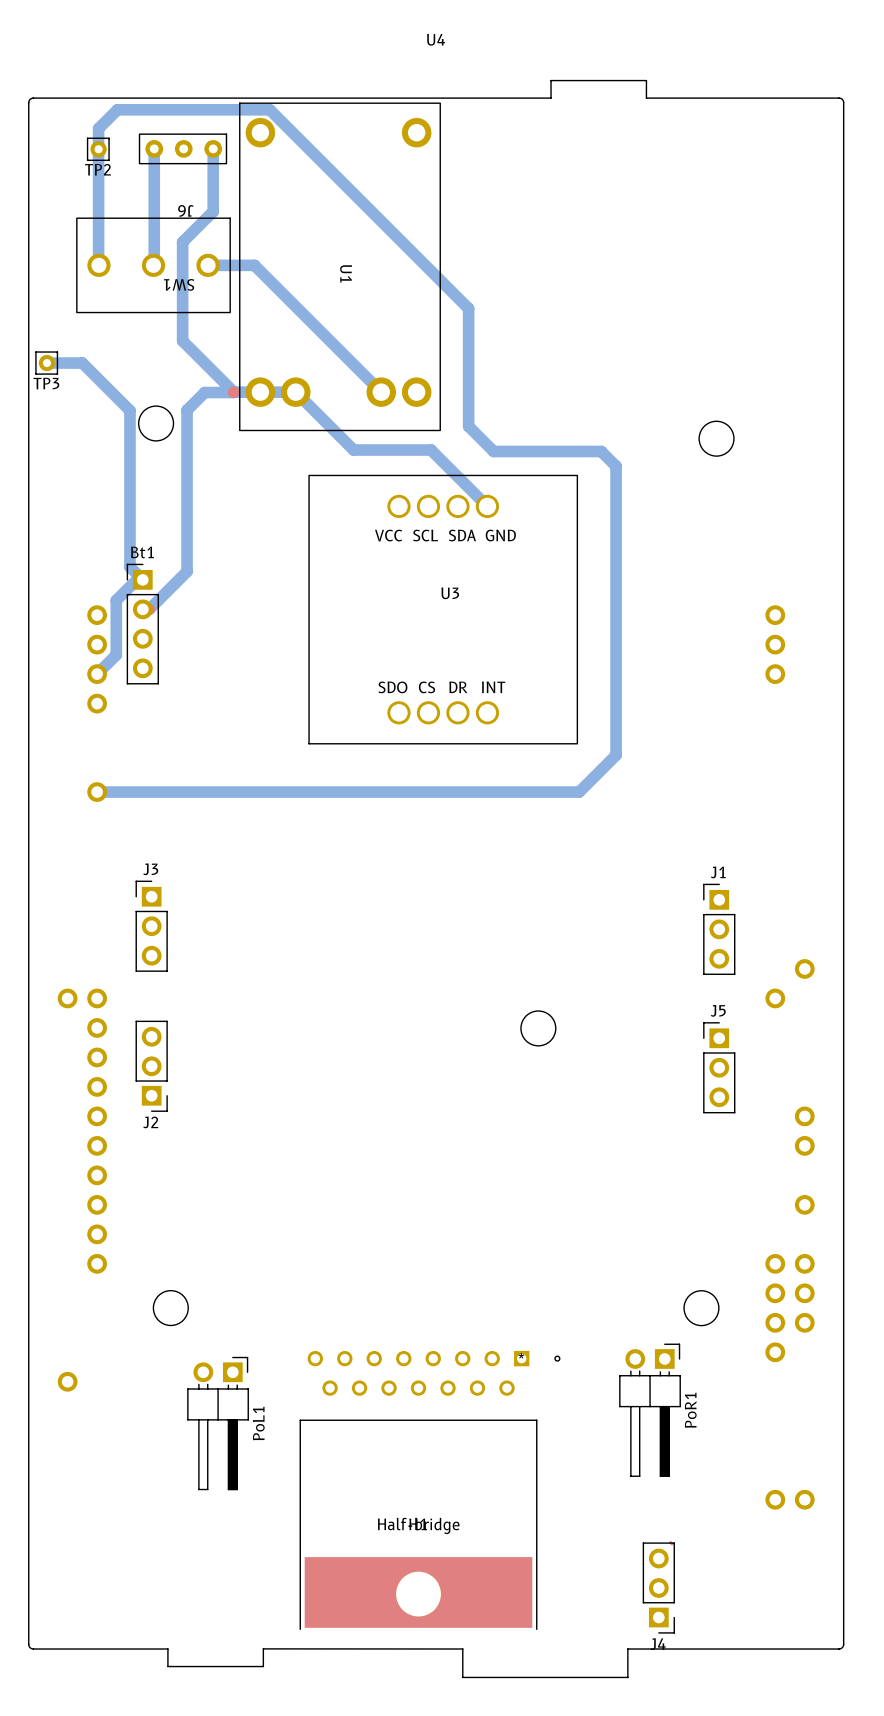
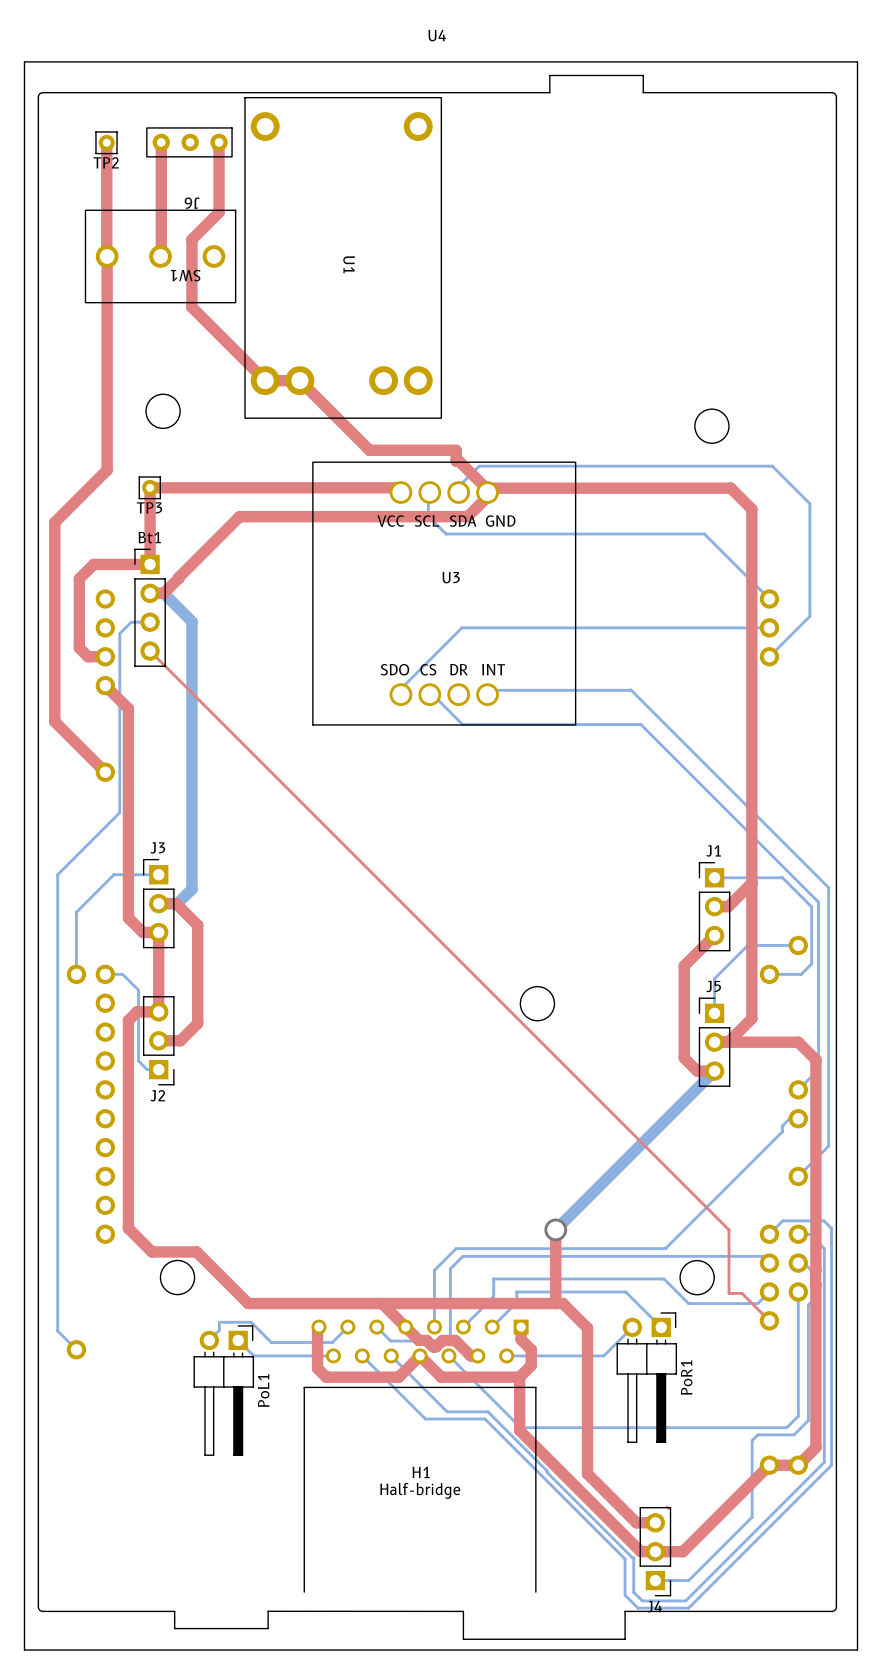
board edge: none -> (24, 61) (857, 61) (857, 1650) (24, 1650) (24, 61)
top track: none -> (161, 139) (161, 255)
top track: none -> (219, 139) (219, 212) (191, 239) (191, 307) (265, 380) (299, 380) (369, 450) (456, 450) (456, 461) (459, 461) (486, 488)
bottom track: (154, 148) (153, 265) -> none
bottom track: (213, 148) (213, 211) (182, 242) (182, 340) (233, 392) (295, 392) (353, 450) (431, 450) (487, 506) -> none
top track: none -> (106, 142) (106, 256)
bottom track: (98, 264) (98, 128) (117, 109) (269, 109) (468, 308) (468, 426) (493, 451) (601, 451) (616, 466) (616, 755) (579, 792) (97, 792) -> none
top track: none -> (107, 256) (107, 470) (54, 522) (54, 721) (105, 772)
bottom track: (208, 265) (254, 265) (381, 392) -> none
bottom track: (46, 363) (82, 363) (129, 410) (129, 567) (142, 579) (136, 579) (116, 600) (116, 654) (97, 674) -> none
TP3 position: (46, 363) -> (149, 487)
top track: (233, 392) (233, 392) -> none
bottom track: (233, 392) (204, 392) (187, 410) (187, 571) (149, 609) -> none
top track: none -> (399, 488) (150, 487) (150, 564) (93, 564) (79, 578) (79, 648) (88, 656) (105, 656)
bottom track: none -> (428, 488) (427, 515) (446, 534) (704, 534) (769, 598)
bottom track: none -> (457, 488) (479, 466) (772, 466) (809, 503) (809, 616) (769, 656)
top track: none -> (486, 488) (486, 498) (467, 516) (239, 516) (163, 593) (156, 593)
top track: none -> (486, 488) (730, 488) (751, 509) (751, 1018) (728, 1042)
bottom track: none -> (150, 593) (163, 593) (191, 621) (191, 889) (177, 903) (158, 903)
bottom track: none -> (150, 622) (131, 622) (119, 633) (119, 812) (57, 874) (57, 1330) (76, 1349)
bottom track: none -> (769, 627) (461, 627) (399, 690)
top track: none -> (150, 651) (729, 1230) (729, 1293) (742, 1293) (769, 1320)
top track: none -> (105, 685) (128, 708) (128, 918) (142, 932) (158, 932) (158, 1011) (137, 1011) (128, 1020) (128, 1228) (151, 1251) (196, 1251) (248, 1303) (562, 1303) (587, 1328) (587, 1473) (636, 1522) (655, 1522)
bottom track: none -> (428, 690) (462, 724) (640, 724) (818, 902) (818, 1069) (798, 1089)
bottom track: none -> (486, 690) (630, 689) (828, 887) (828, 1146) (798, 1176)
bottom track: none -> (158, 874) (113, 874) (76, 912) (76, 974)
bottom track: none -> (714, 877) (782, 877) (811, 906) (811, 963) (801, 974) (769, 974)
top track: none -> (751, 883) (728, 906) (714, 906)
top track: none -> (158, 903) (176, 903) (197, 925) (197, 1023) (180, 1040) (158, 1040)
top track: none -> (714, 935) (684, 965) (684, 1058) (697, 1071) (714, 1071)
bottom track: none -> (798, 945) (747, 945) (714, 978) (714, 1013)
bottom track: none -> (105, 974) (122, 974) (138, 990) (138, 1060) (147, 1069) (158, 1069)
top track: none -> (714, 1042) (798, 1042) (815, 1059) (815, 1447) (798, 1465) (769, 1465) (682, 1551) (640, 1551) (519, 1430) (519, 1377)
bottom track: none -> (714, 1071) (555, 1229)
bottom track: none -> (798, 1118) (789, 1118) (782, 1125) (782, 1131) (665, 1248) (456, 1248) (434, 1270) (434, 1327)
top track: none -> (555, 1229) (555, 1303)
via: none -> (555, 1229)
bottom track: none -> (769, 1234) (782, 1220) (823, 1220) (831, 1228) (831, 1465) (688, 1608) (638, 1608) (625, 1595) (625, 1559) (485, 1419) (425, 1419) (362, 1355)
bottom track: none -> (798, 1234) (809, 1234) (824, 1248) (824, 1462) (685, 1600) (642, 1600) (633, 1592) (633, 1557) (487, 1411) (447, 1411) (391, 1355)
bottom track: none -> (769, 1263) (762, 1256) (462, 1256) (450, 1268) (450, 1336) (446, 1341) (390, 1341) (376, 1327)
bottom track: none -> (798, 1263) (804, 1263) (814, 1273) (814, 1299) (808, 1304) (808, 1420) (793, 1434) (757, 1434) (752, 1440) (752, 1517) (688, 1580) (655, 1580)
bottom track: none -> (769, 1291) (757, 1303) (688, 1303) (664, 1278) (493, 1278) (493, 1296) (463, 1327)
bottom track: none -> (798, 1291) (798, 1416) (786, 1427) (520, 1427) (448, 1355)
top track: none -> (382, 1303) (419, 1340) (426, 1340) (433, 1346) (436, 1346) (442, 1340) (455, 1340) (470, 1355) (477, 1355)
H1 footprint: [299, 1350, 561, 1631] -> [303, 1319, 537, 1593]
top track: none -> (319, 1327) (317, 1368) (326, 1377) (398, 1377) (420, 1355) (441, 1377) (519, 1377)
bottom track: none -> (347, 1327) (332, 1342) (271, 1342) (251, 1322) (219, 1322) (219, 1330) (209, 1340)
bottom track: none -> (492, 1327) (516, 1302) (516, 1291) (625, 1291) (661, 1327)
top track: none -> (521, 1327) (521, 1339) (531, 1349) (531, 1365) (519, 1377)
bottom track: none -> (632, 1327) (603, 1355) (506, 1355)
bottom track: none -> (238, 1340) (253, 1355) (333, 1355)

